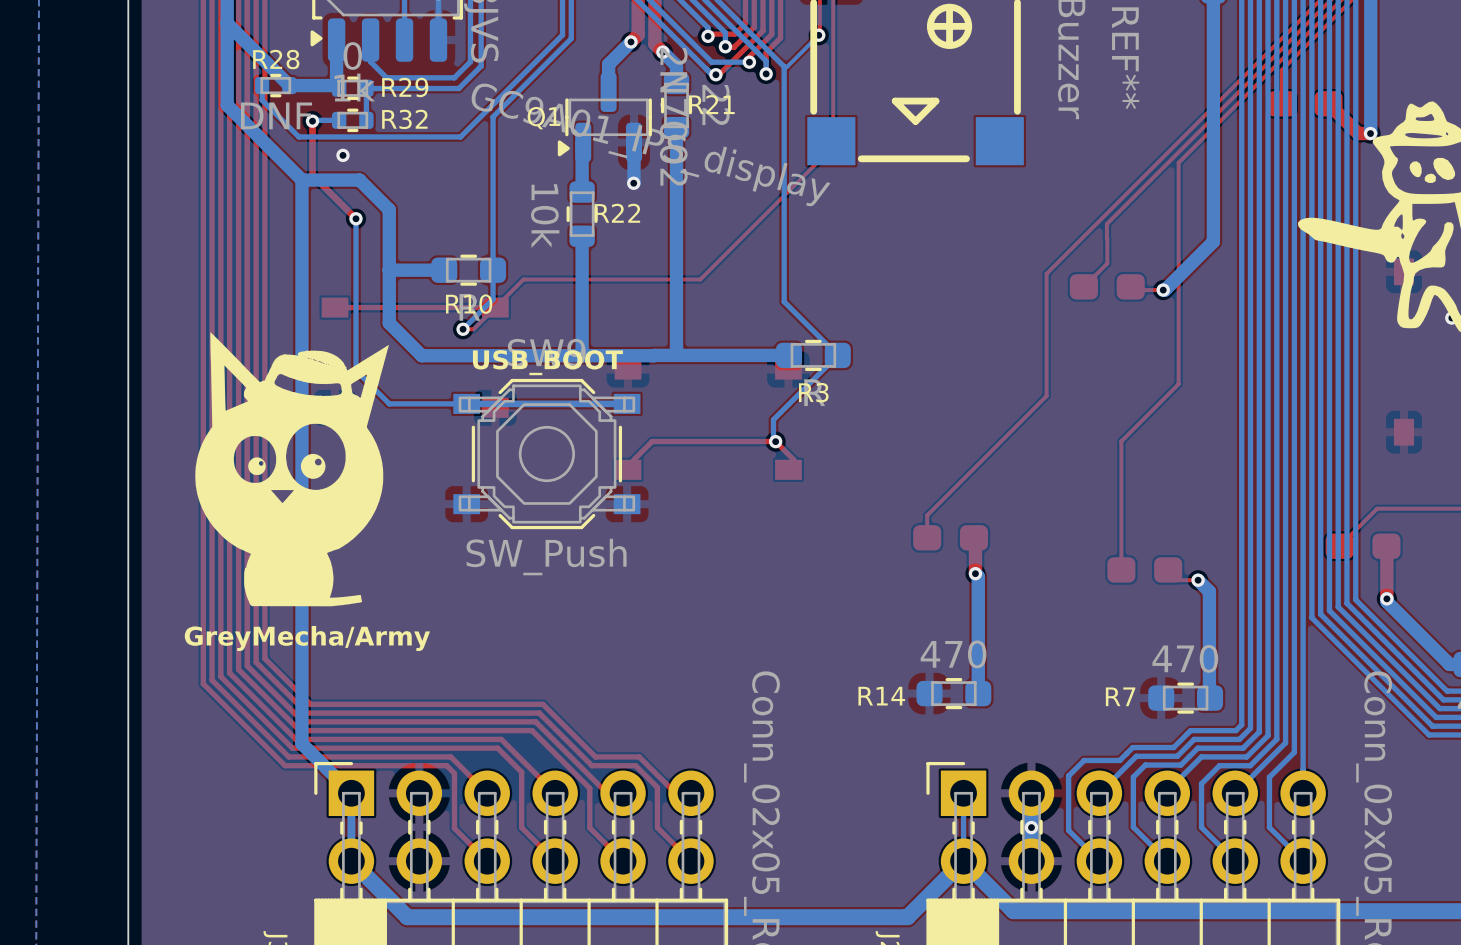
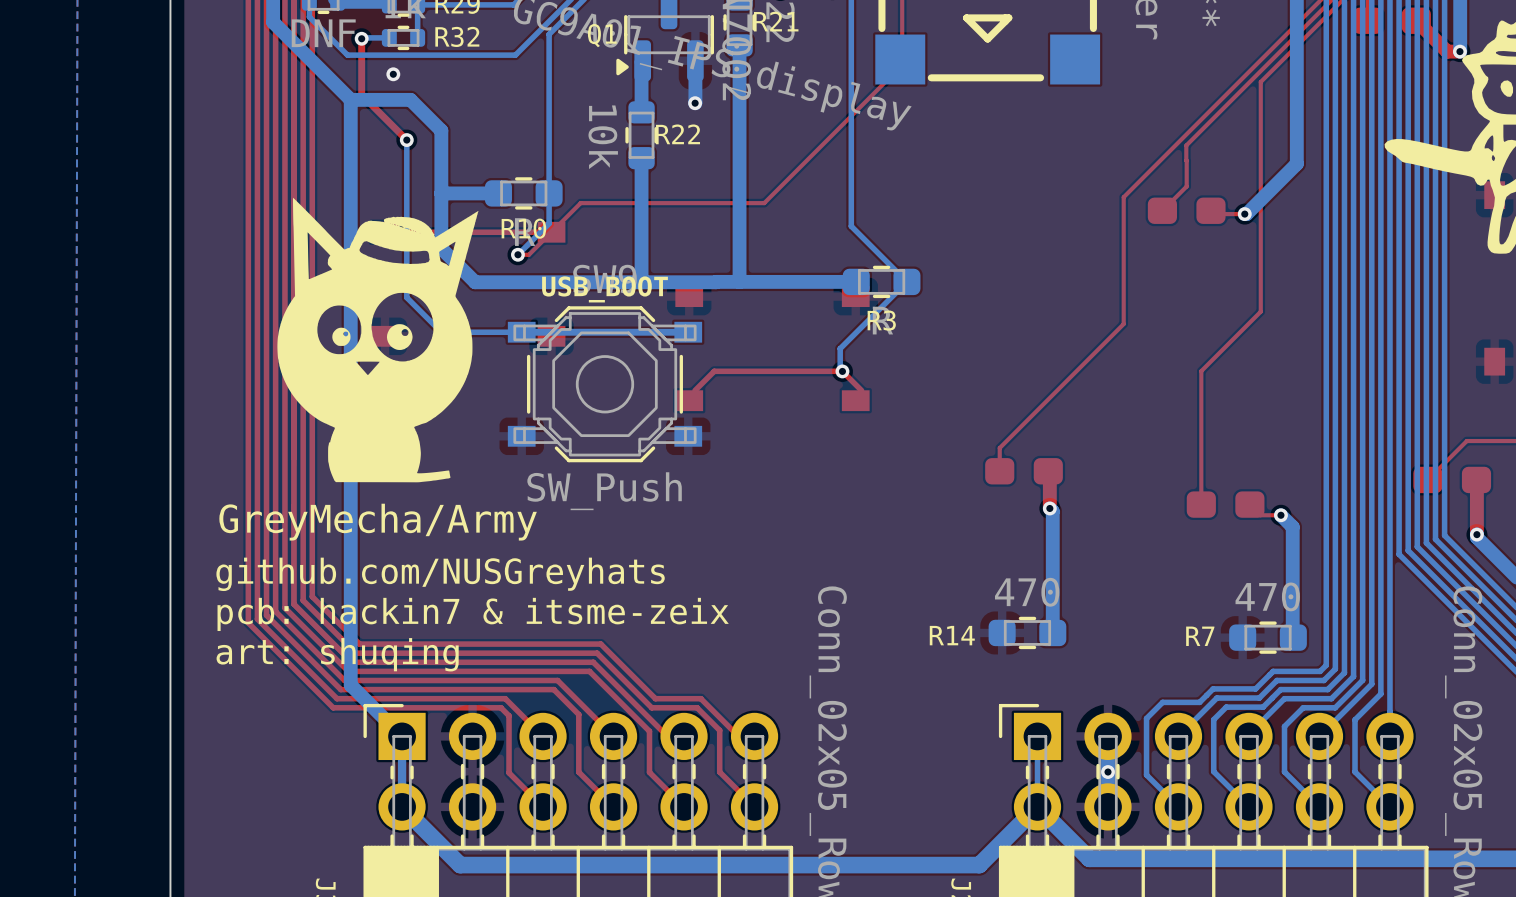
drawing position: (292, 469) -> (377, 340)
text: none -> GreyMecha/Army (378, 522)
text: GreyMecha/Army (307, 638) -> github.com/NUSGreyhats (440, 574)
text: none -> pcb: hackin7 & itsme-zeix (473, 614)
text: none -> art: shuqing (337, 654)

